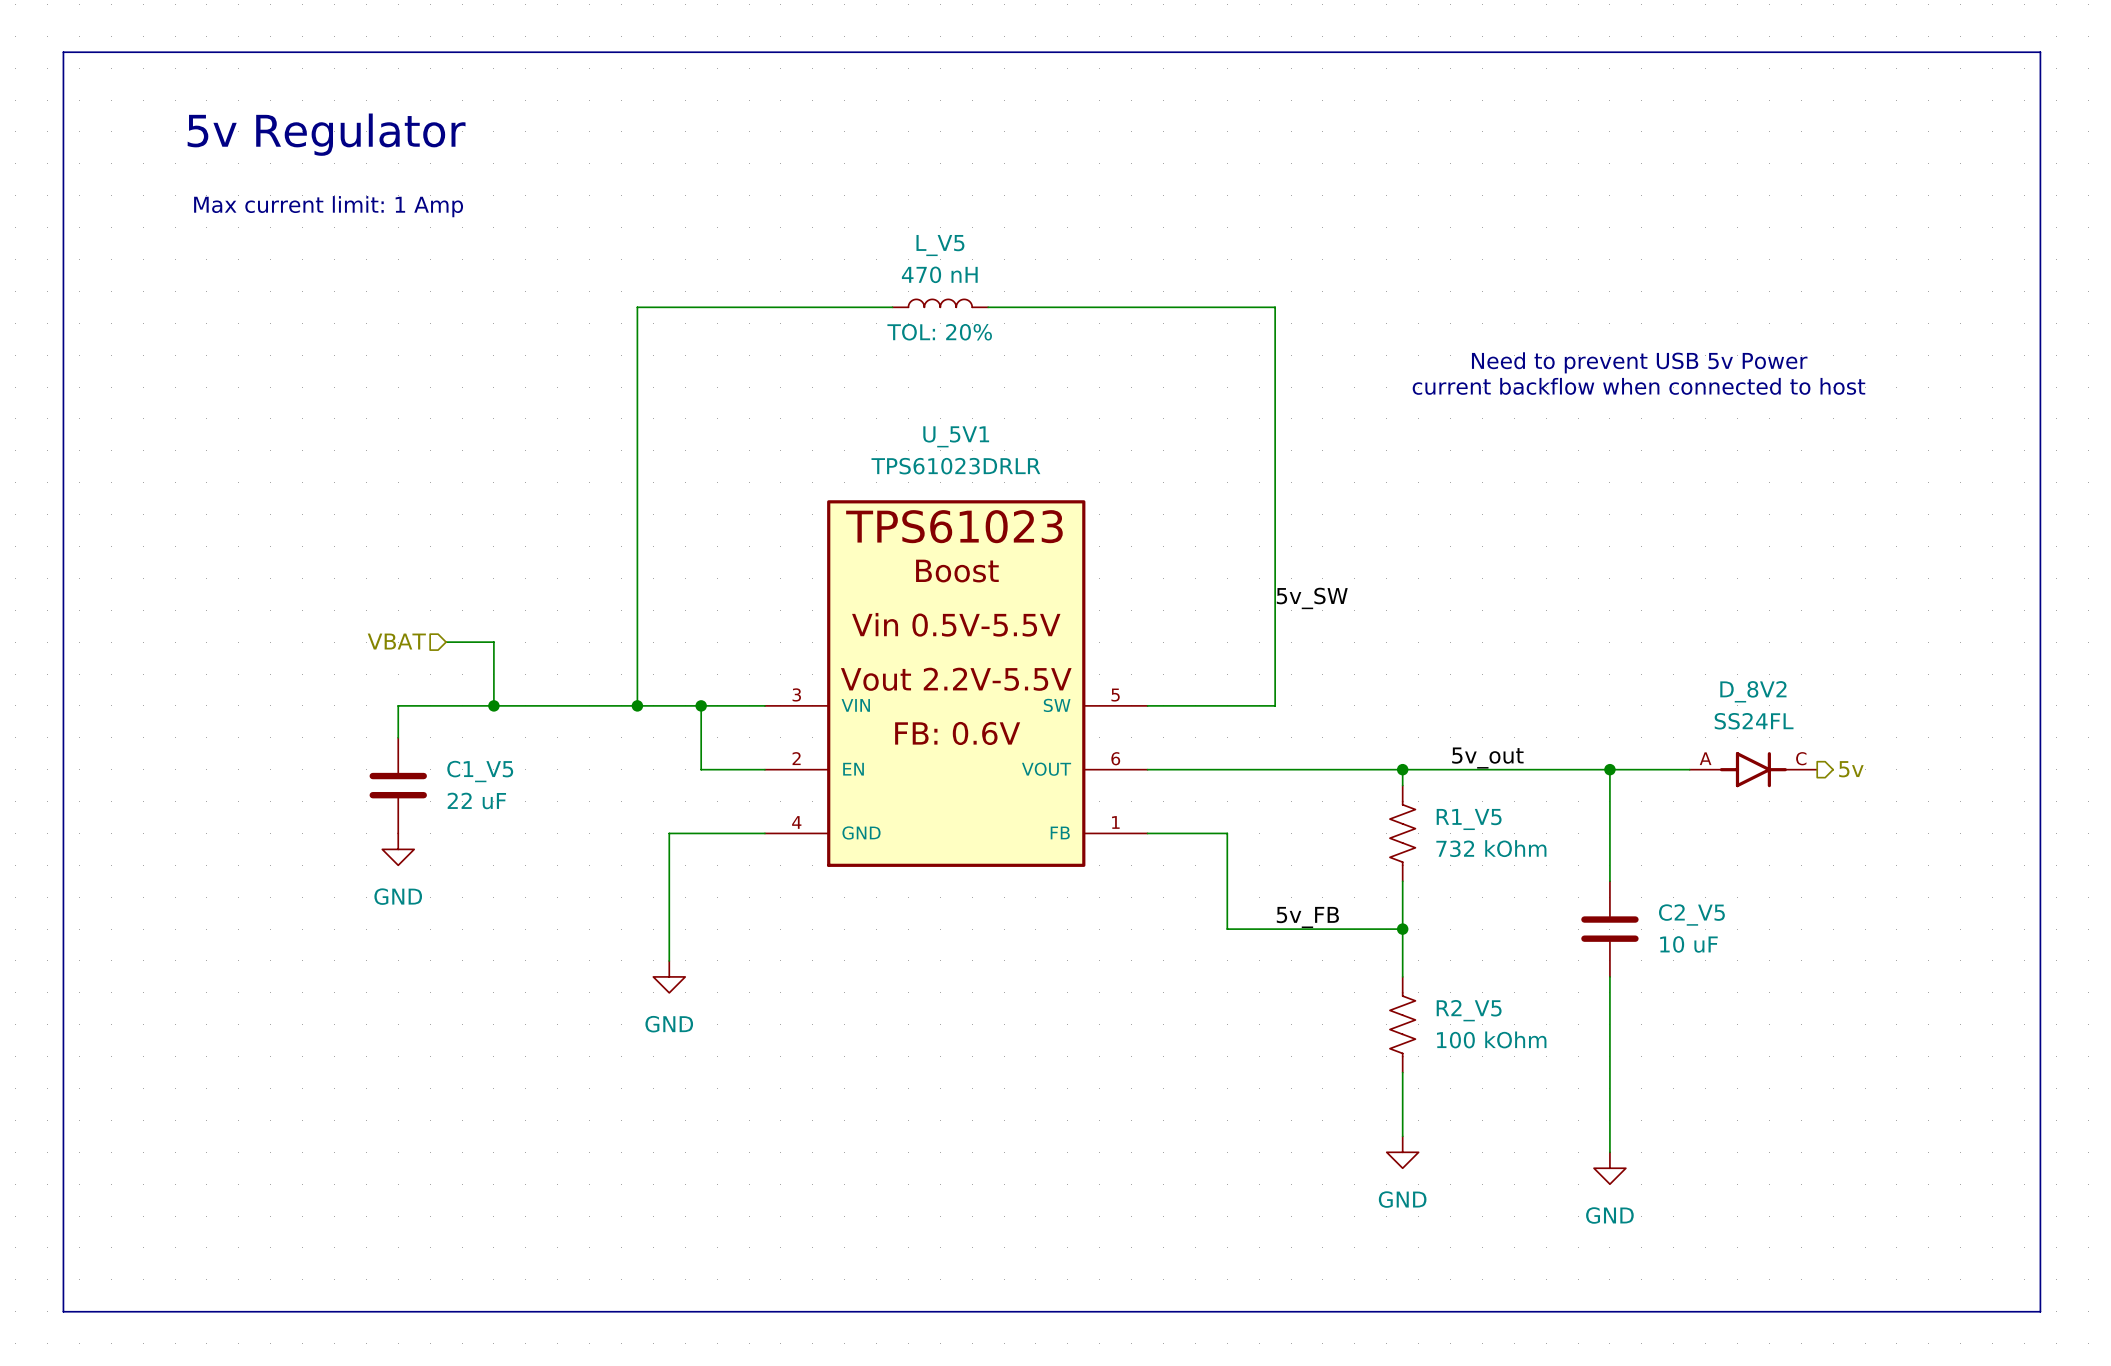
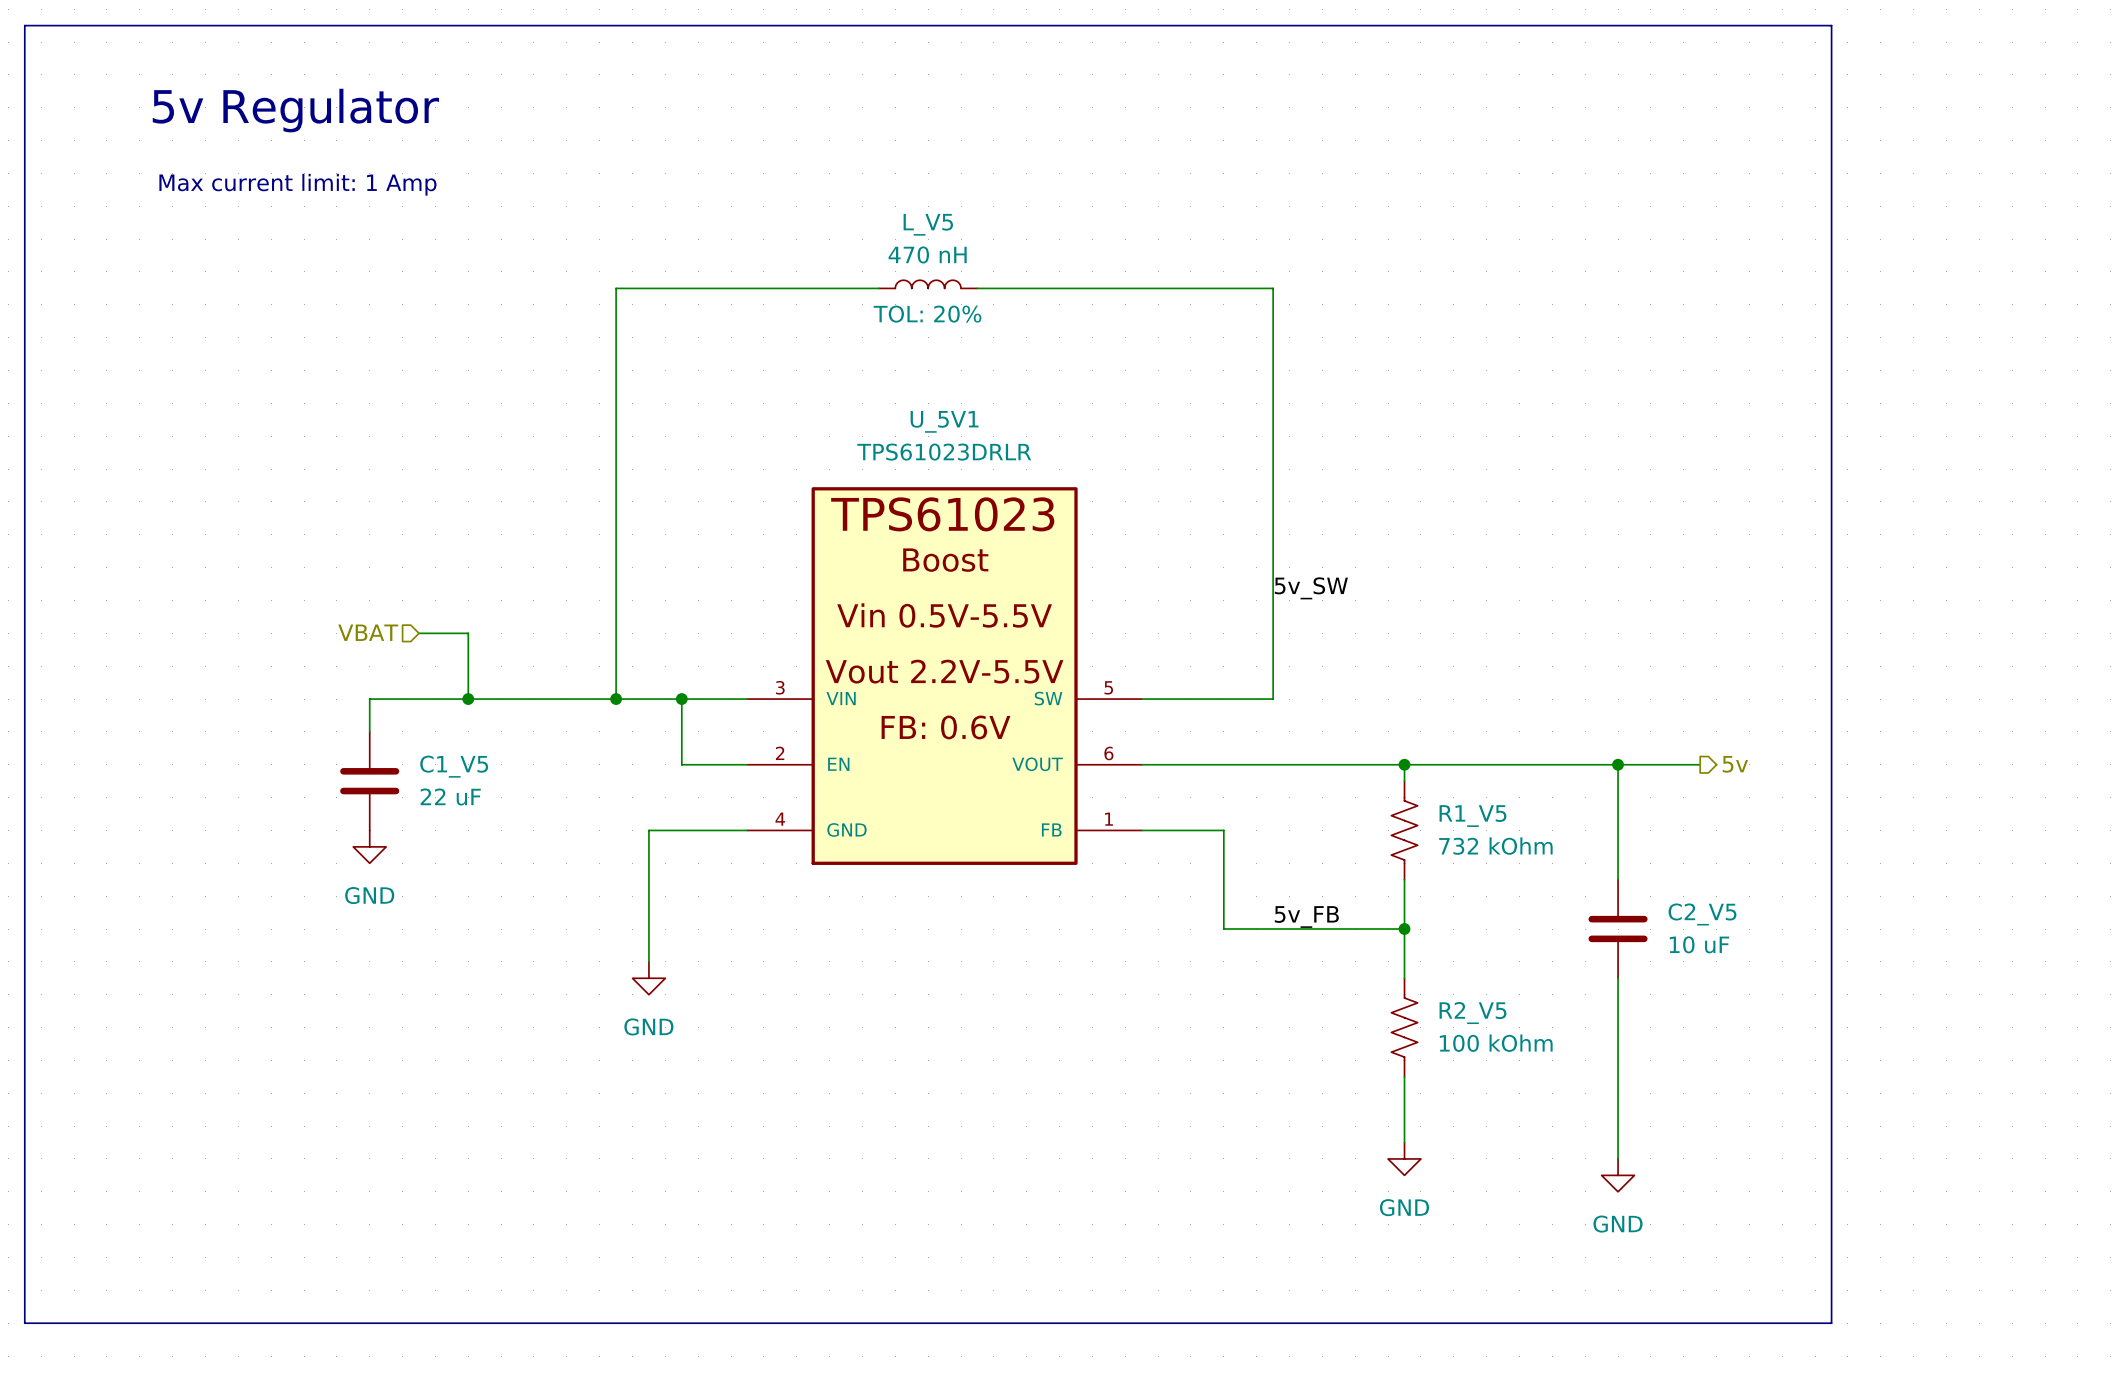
line: (1817, 52) (2040, 52) (2040, 1311) (1817, 1311) -> (1831, 25) (1831, 1323)
text: Need to prevent USB 5v Power (1639, 362) -> none
text: current backflow when connected to host (1638, 386) -> none
label: 5v_out (1487, 758) -> none
D_8V2: SS24FL (1753, 769) -> none
hierarchical label position: 5v (1851, 769) -> 5v (1735, 764)

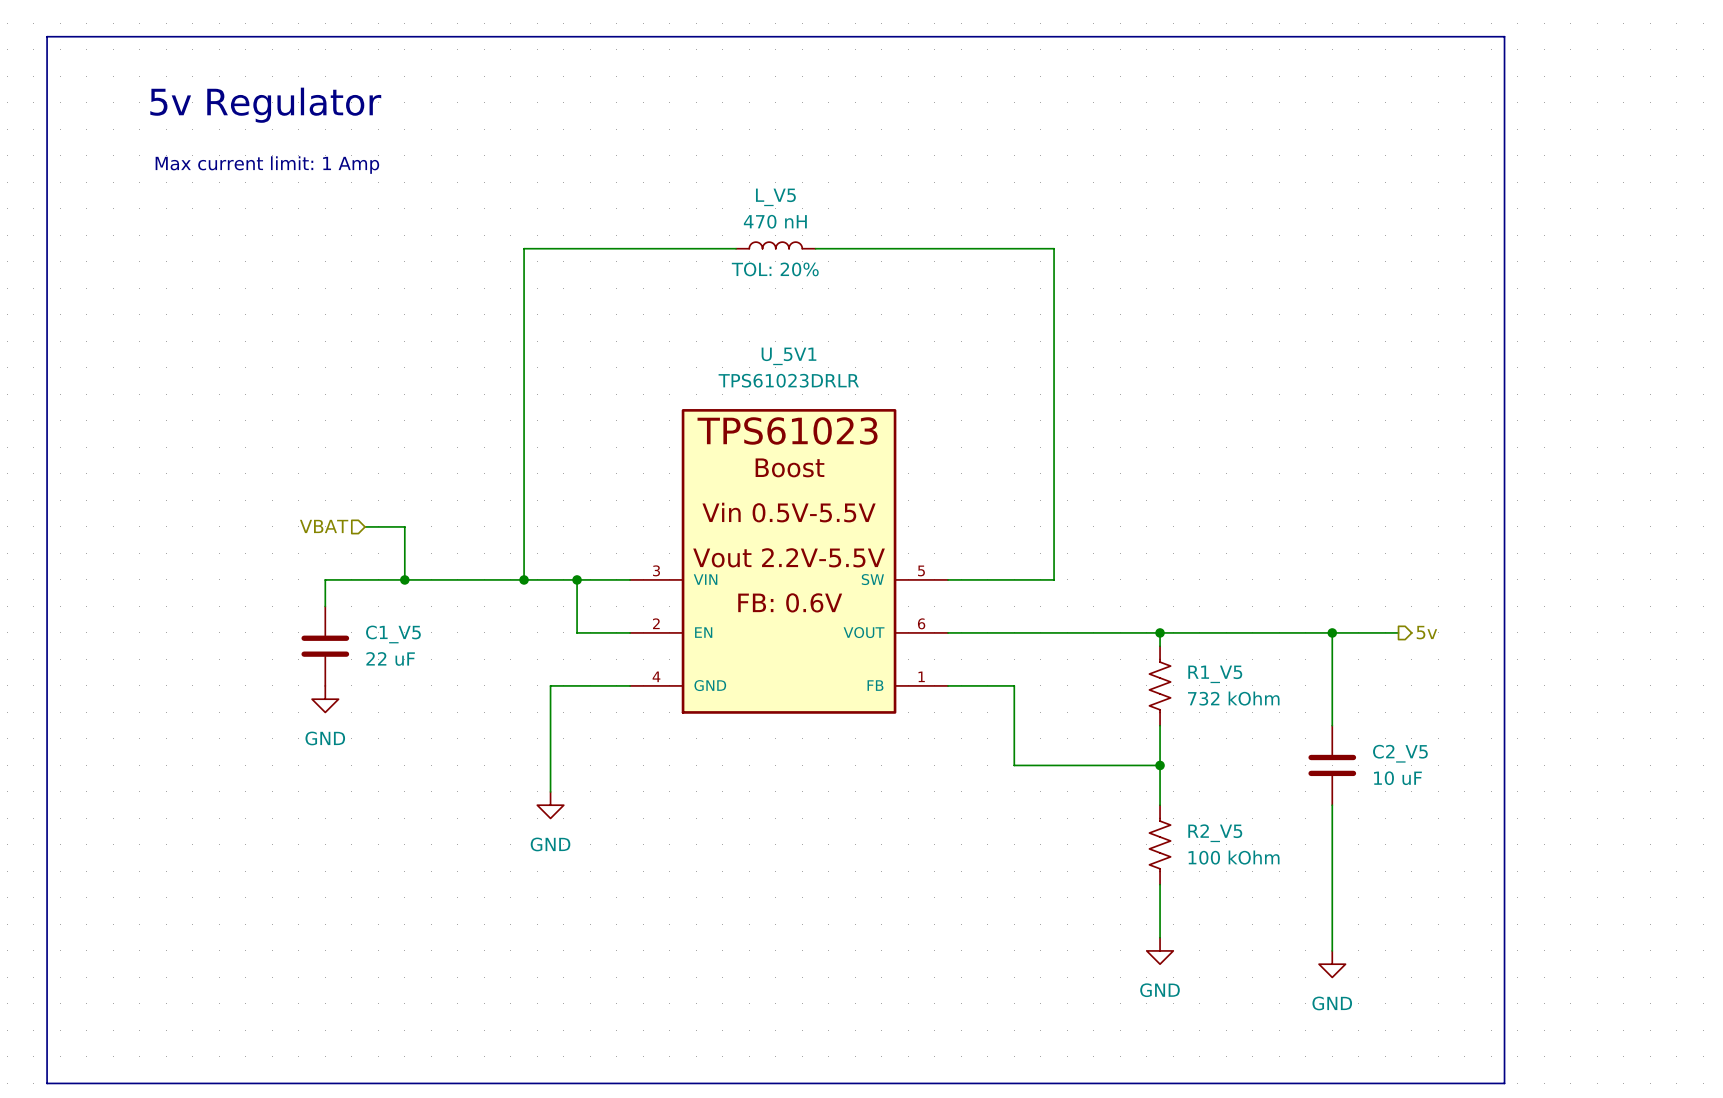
label: 5v_SW (1311, 588) -> none
label: 5v_FB (1306, 917) -> none

